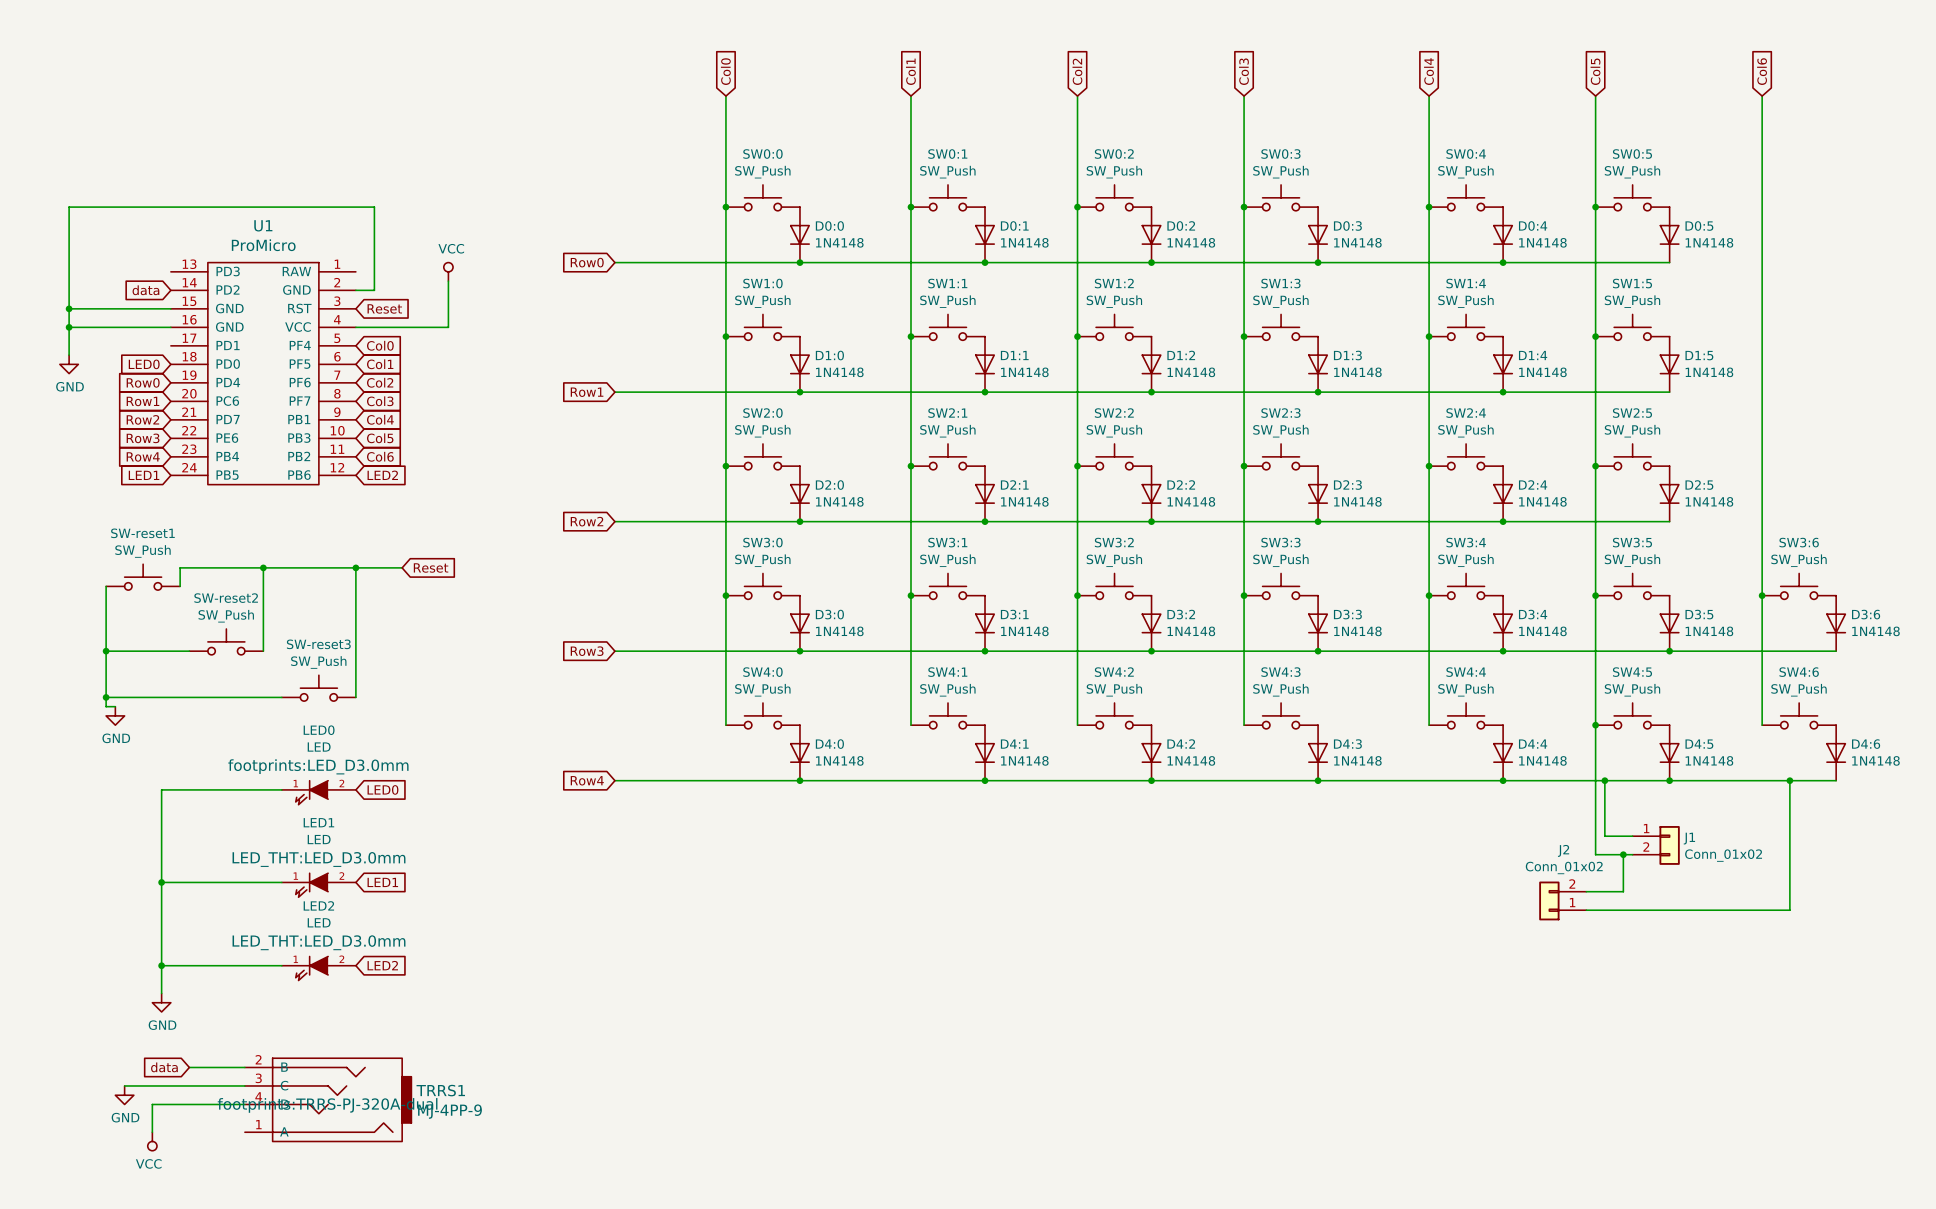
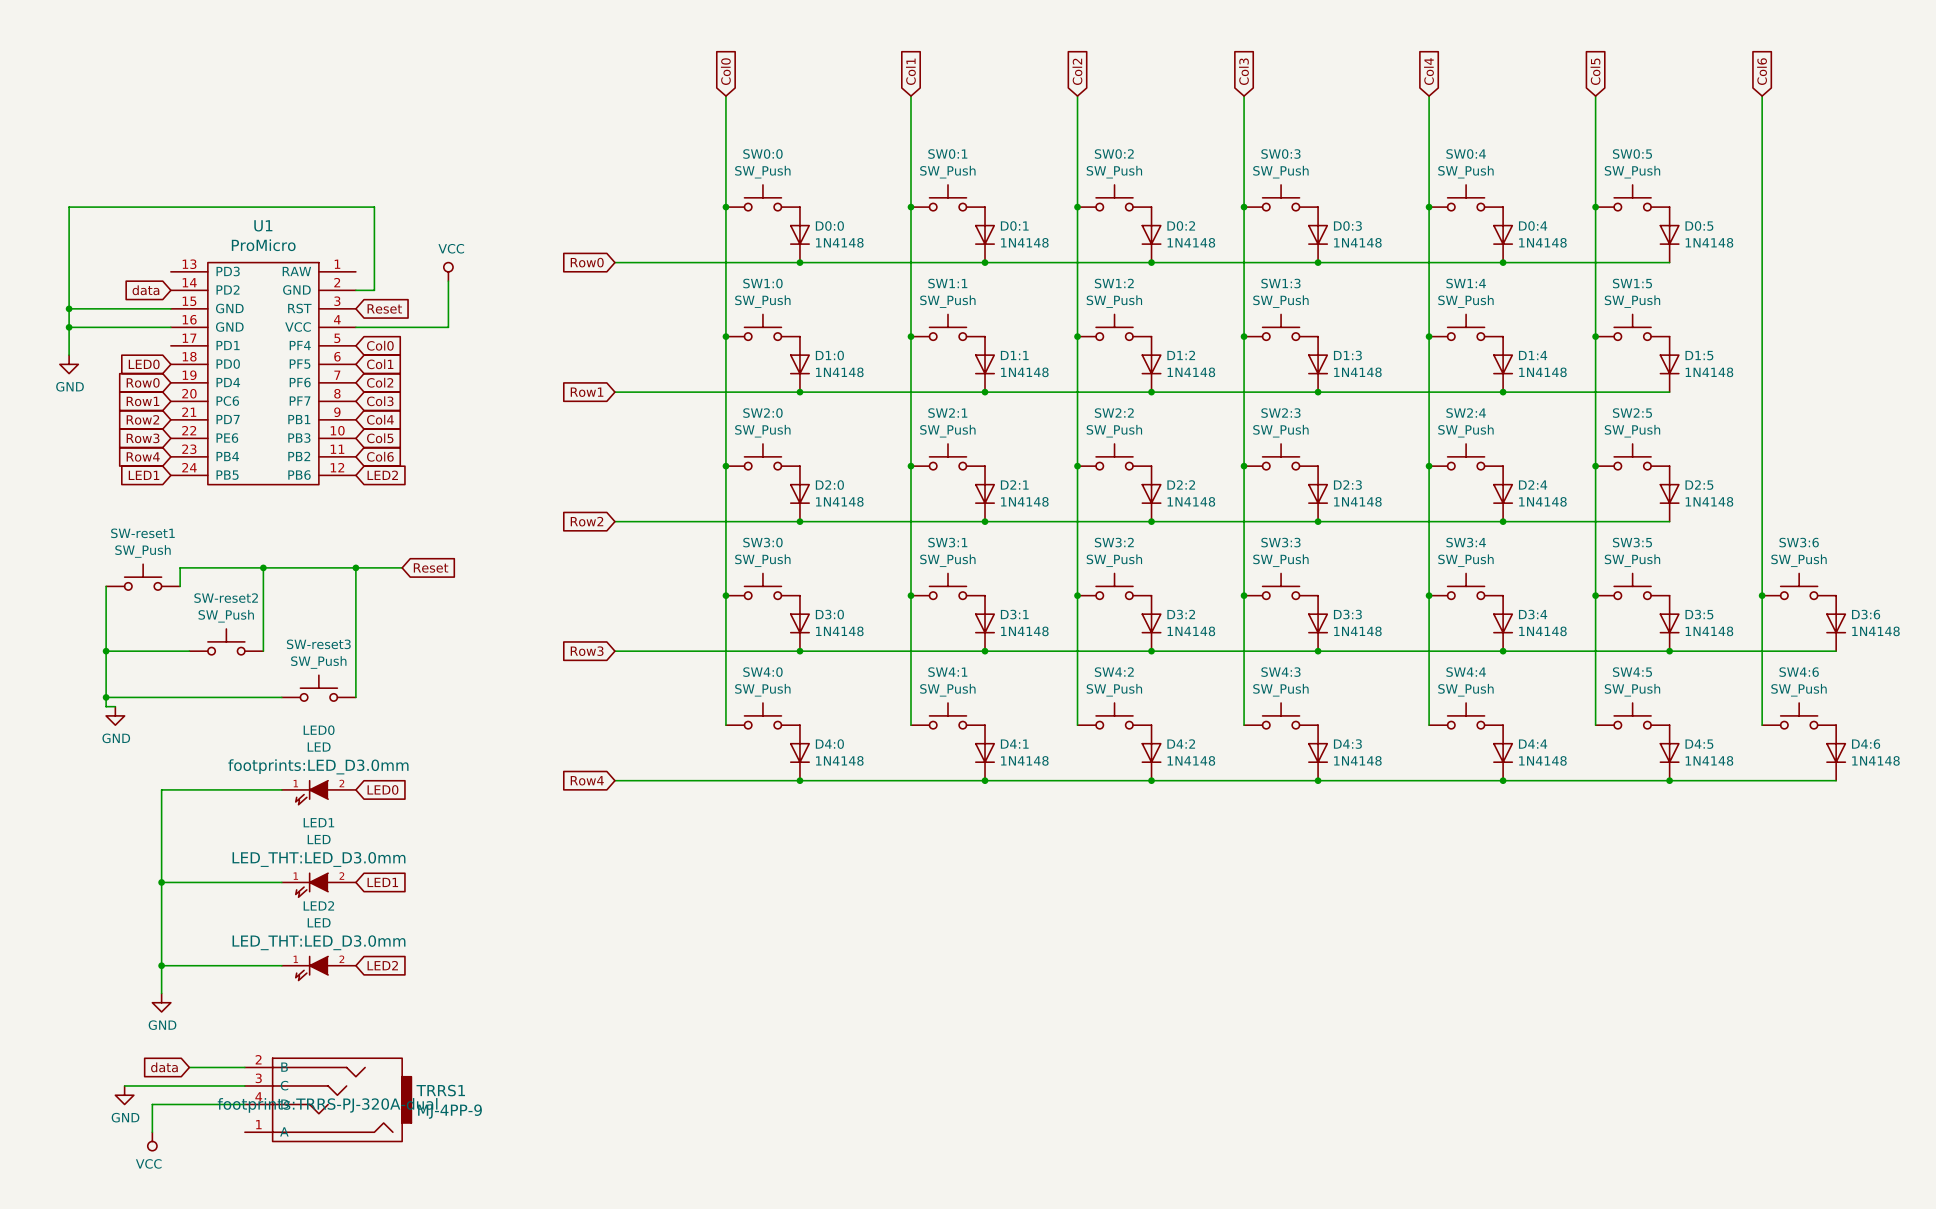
wire: (1595, 725) (1595, 854) (1632, 854) -> none
junction: (1595, 725) -> none
wire: (1604, 780) (1604, 836) (1632, 836) -> none
junction: (1604, 780) -> none
wire: (1789, 780) (1789, 910) (1586, 910) -> none
junction: (1789, 780) -> none
J1: Conn_01x02 (1656, 845) -> none
wire: (1623, 854) (1623, 891) (1586, 891) -> none
junction: (1623, 854) -> none
J2: Conn_01x02 (1562, 900) -> none

